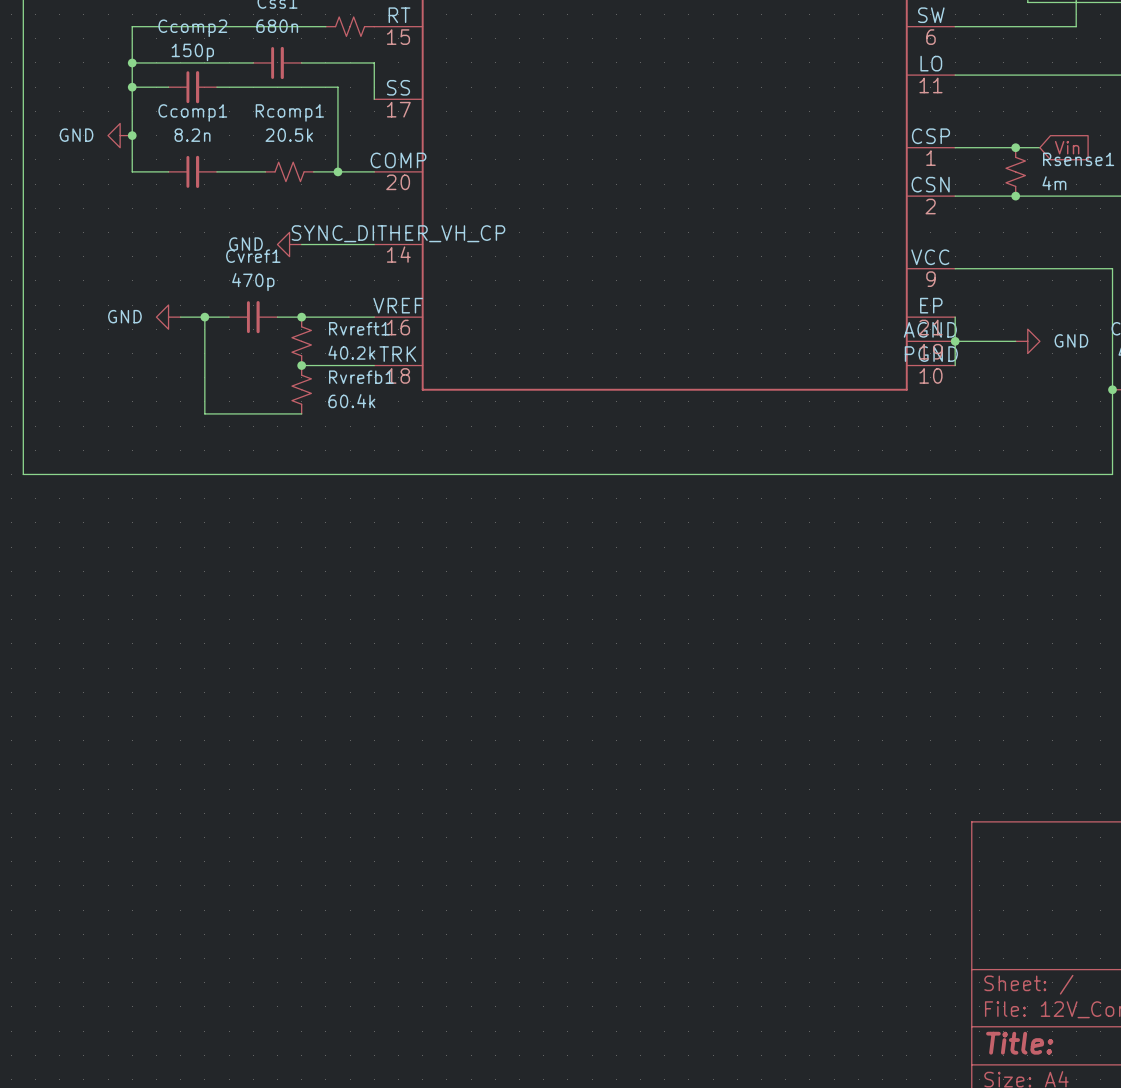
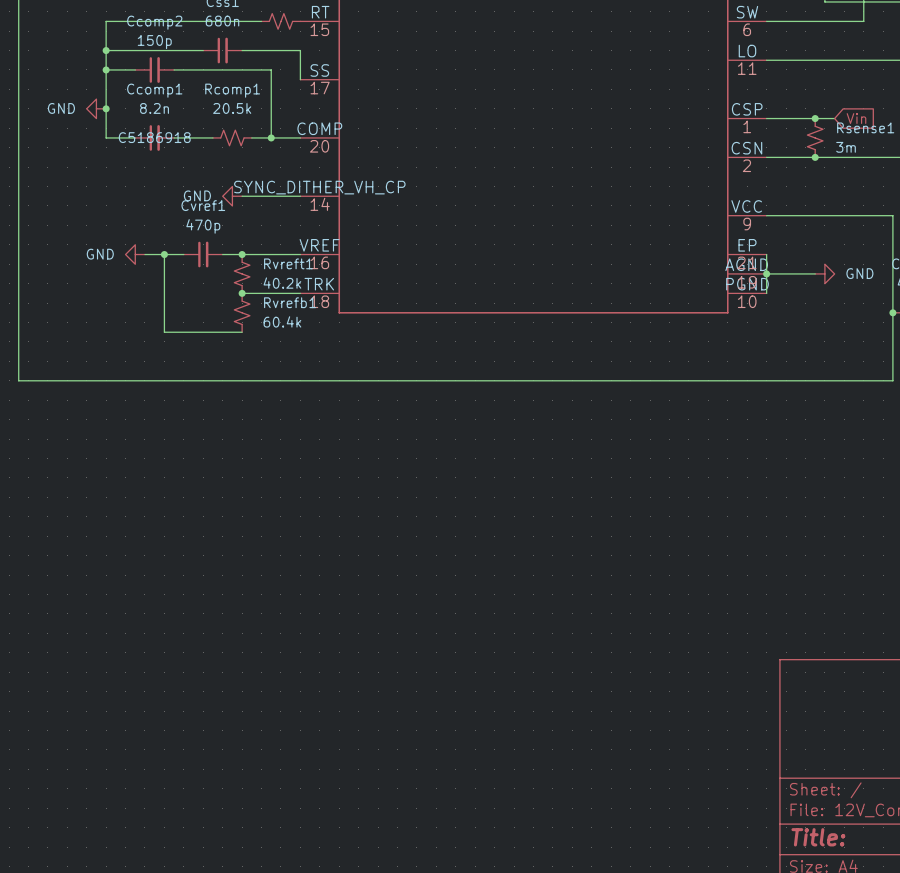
Ccomp1 text: none -> C5186918 (154, 137)
Rsense1 value: 4m (1054, 183) -> 3m (846, 147)

